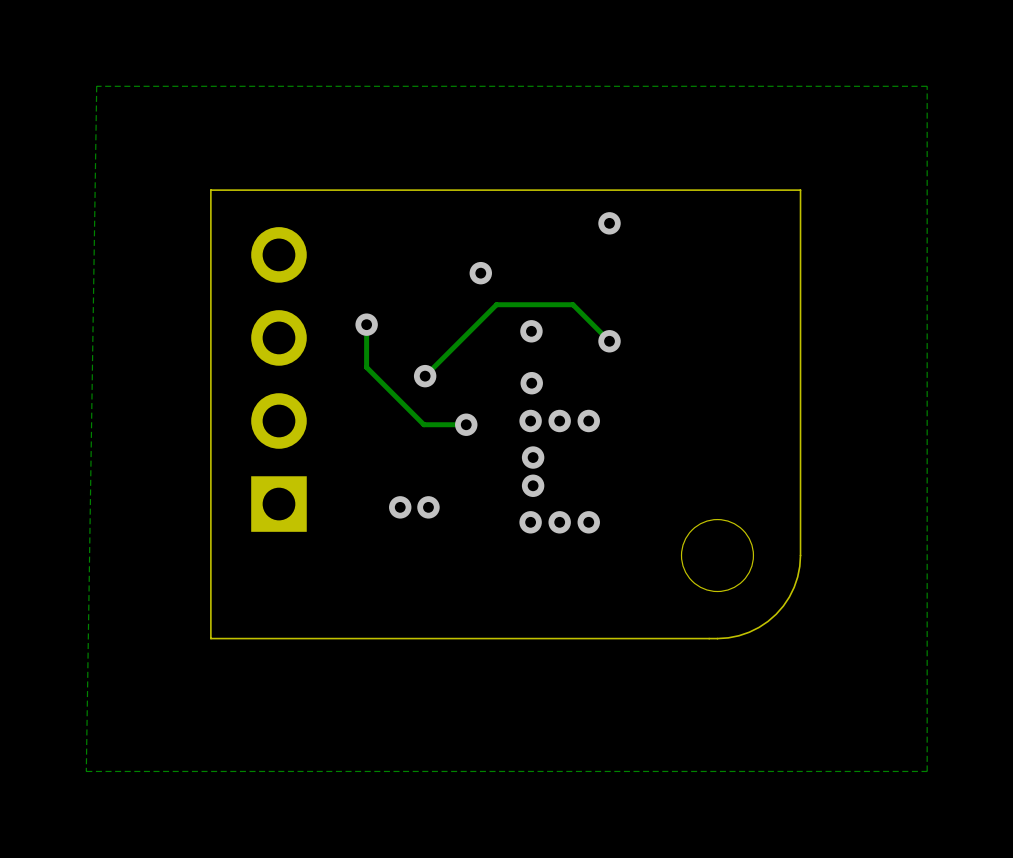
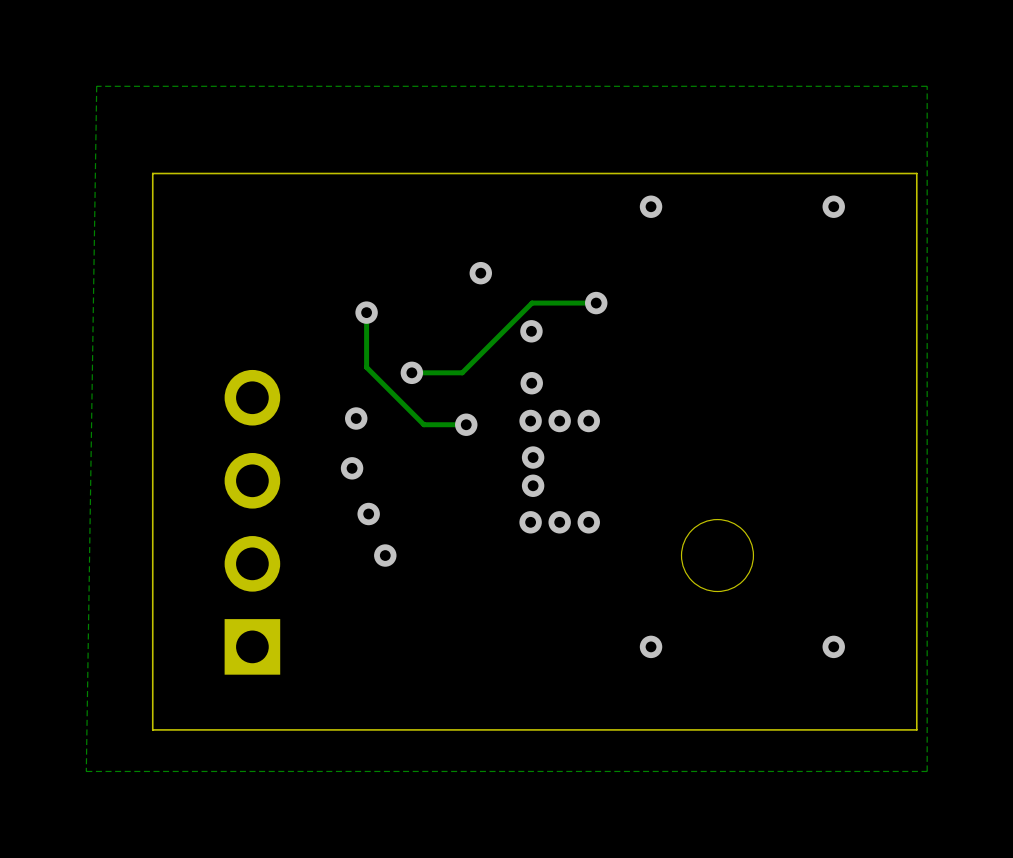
board edge: (800, 190) (799, 566) (789, 597) (768, 621) (749, 632) (717, 638) (210, 638) (210, 190) (800, 190) -> (916, 173) (916, 729) (152, 729) (152, 173) (916, 173)
via: none -> (651, 206)
via: none -> (833, 206)
via: (609, 223) -> none
track: none -> (596, 303) (532, 303) (462, 372) (411, 372)
via: none -> (596, 303)
track: (366, 324) (366, 367) -> (366, 312) (366, 367)
via position: (366, 324) -> (366, 312)
track: (609, 341) (572, 304) (496, 304) (425, 376) -> none
via: (609, 341) -> none
via position: (425, 376) -> (411, 372)
part position: (278, 379) -> (252, 522)
via: none -> (356, 418)
via: none -> (352, 468)
via: (400, 507) -> none
via: (428, 507) -> none
via: none -> (368, 514)
via: none -> (385, 555)
via: none -> (651, 646)
via: none -> (833, 646)

